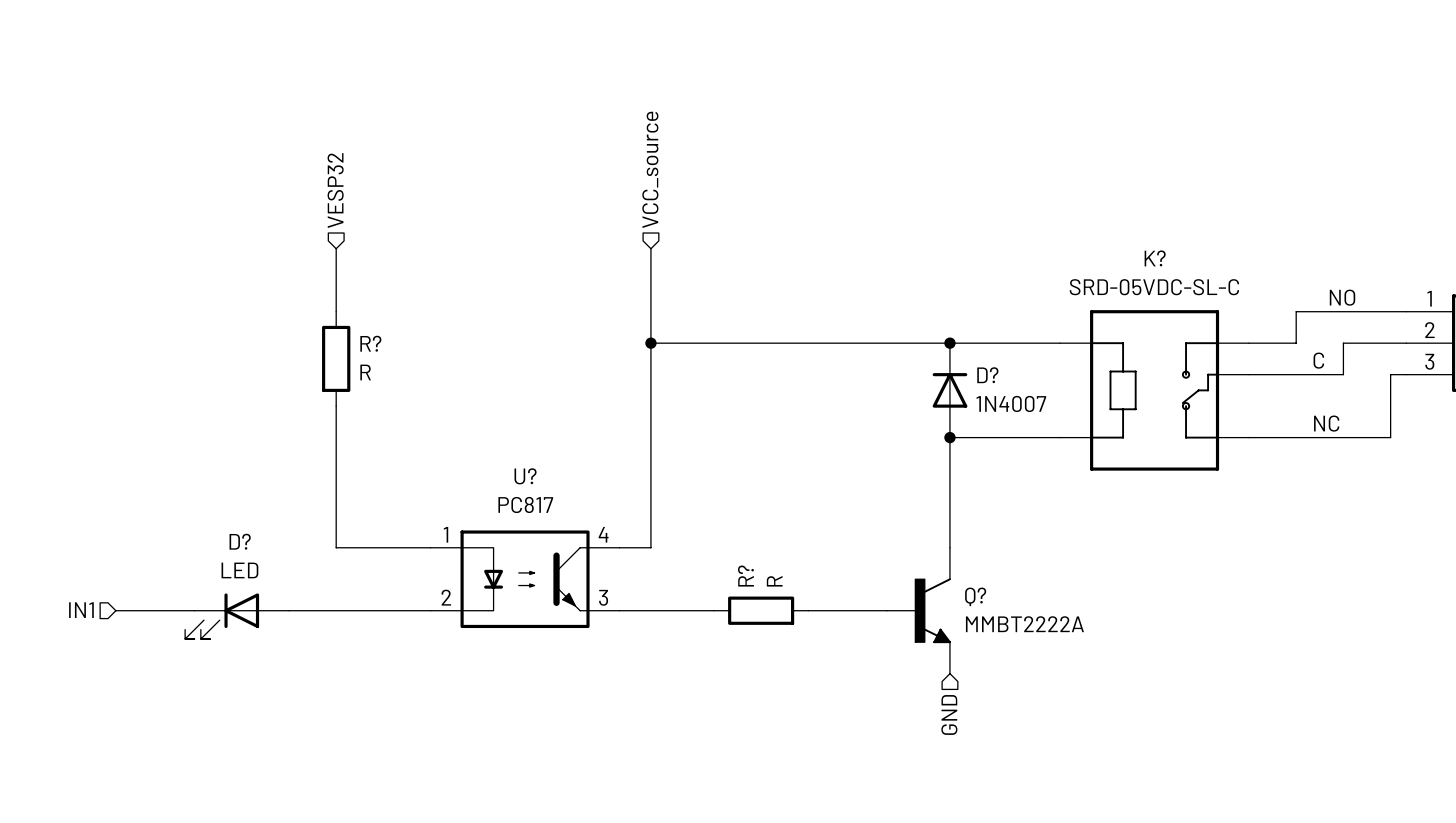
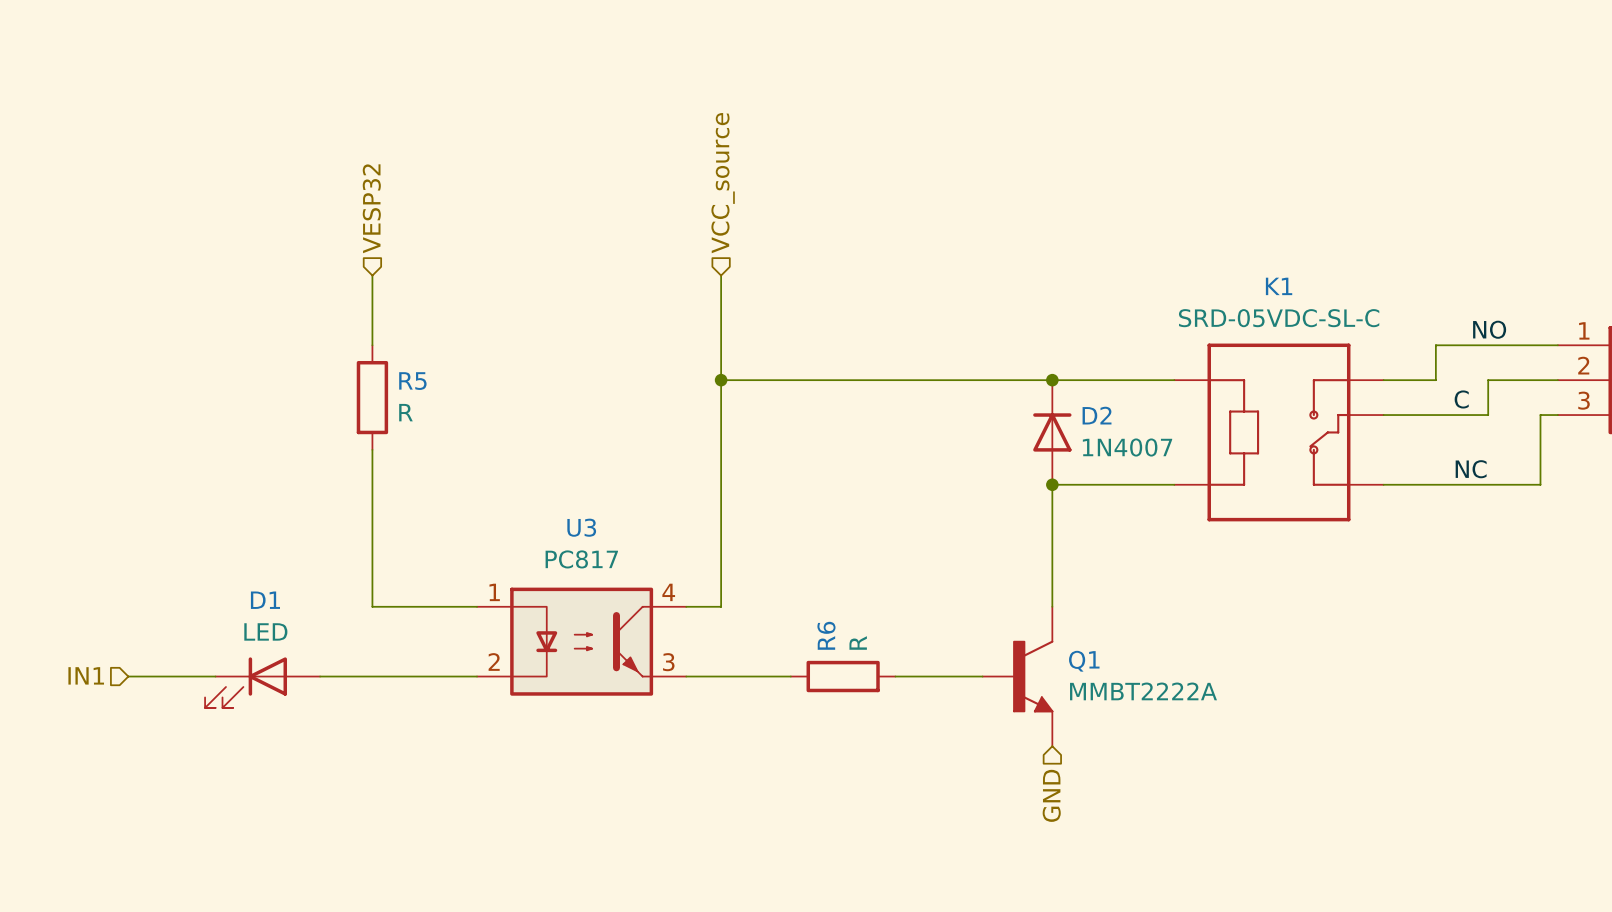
K? name: K? (1155, 258) -> K1 (1279, 286)
R? name: R? (370, 343) -> R5 (412, 381)
D? name: D? (987, 375) -> D2 (1097, 415)
U? name: U? (525, 476) -> U3 (581, 527)
D? name: D? (240, 541) -> D1 (265, 600)
R? name: R? (745, 576) -> R6 (826, 635)
Q? name: Q? (975, 596) -> Q1 (1084, 661)

